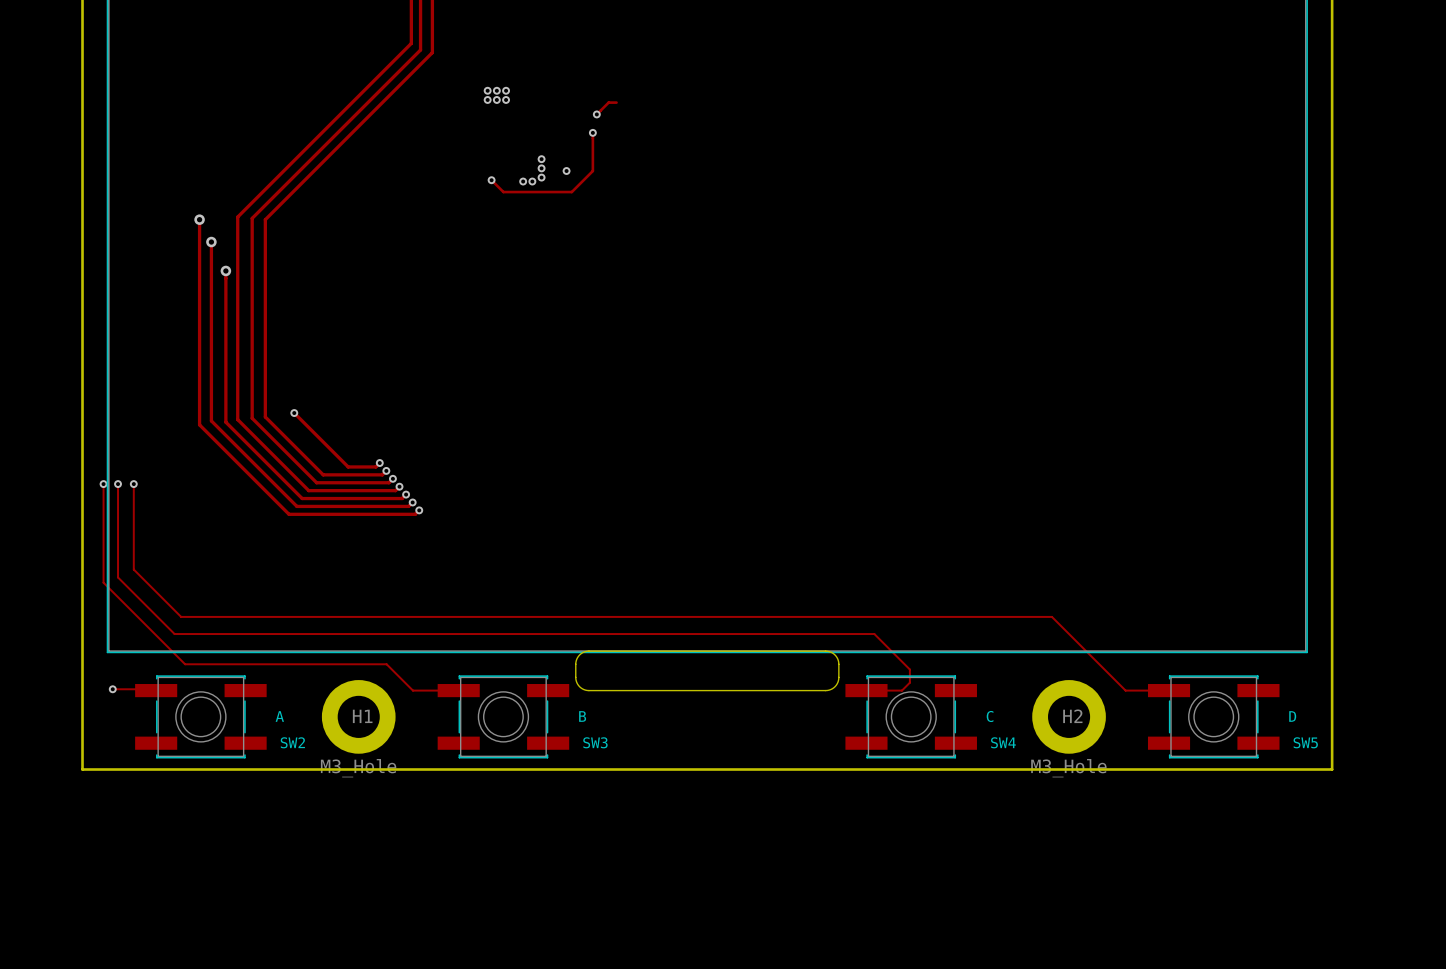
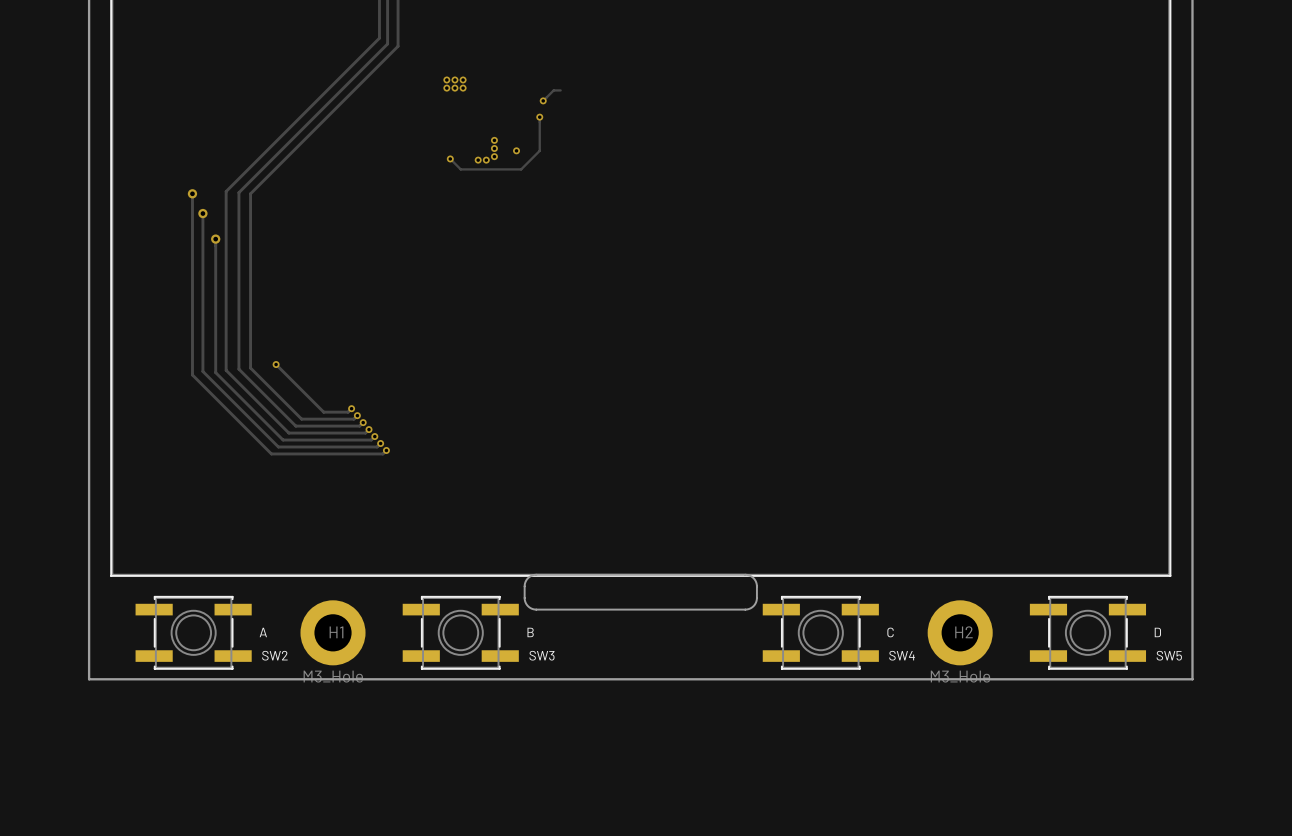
track: (103, 484) (103, 582) (185, 664) (386, 664) (412, 690) (458, 690) -> none
via: (103, 484) -> none
track: (118, 484) (118, 577) (174, 634) (874, 634) (909, 669) (909, 682) (901, 690) (866, 690) -> none
via: (118, 484) -> none
track: (133, 484) (133, 569) (181, 616) (1051, 616) (1125, 690) (1169, 690) -> none
via: (133, 484) -> none
track: (112, 689) (156, 690) -> none
via: (112, 689) -> none

